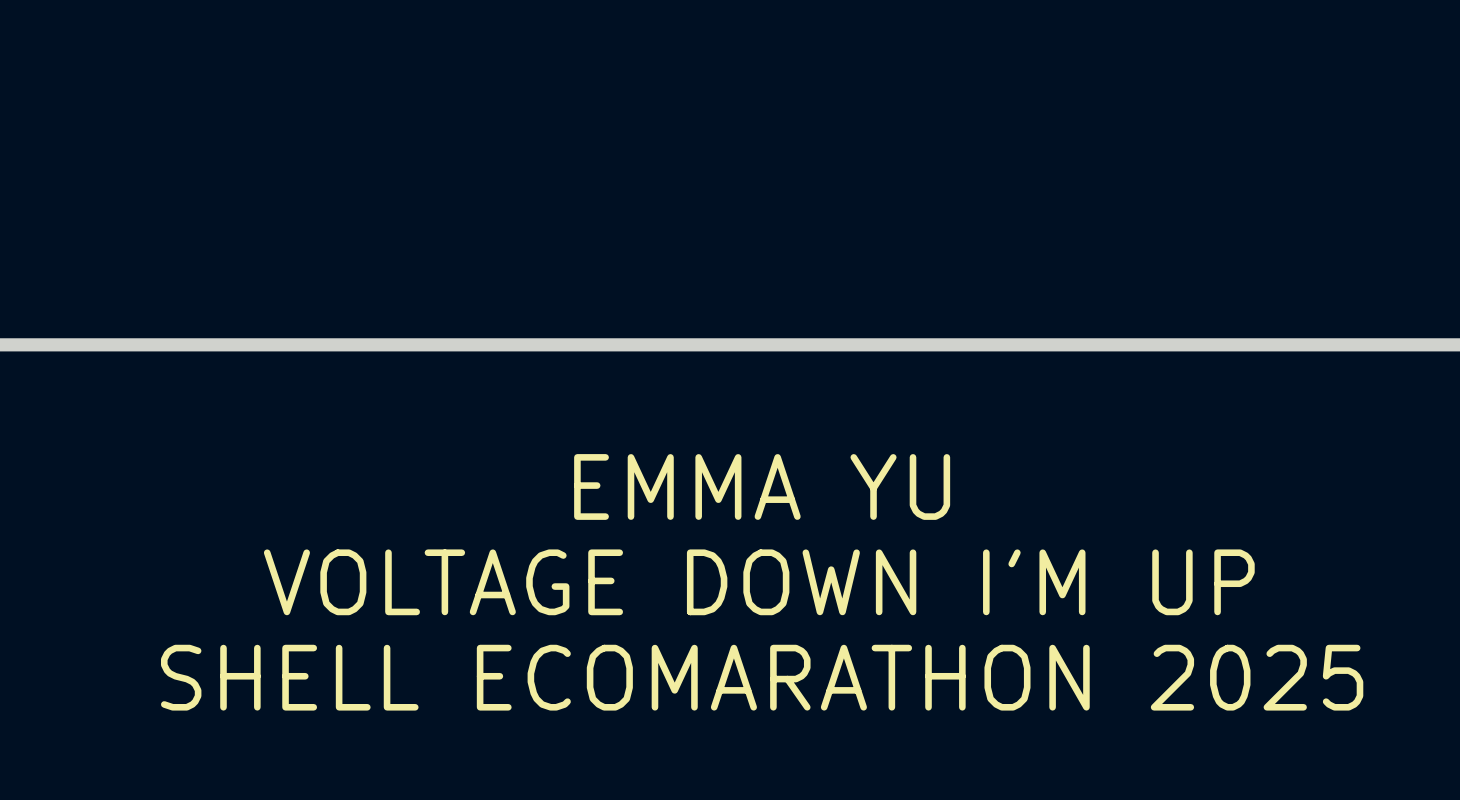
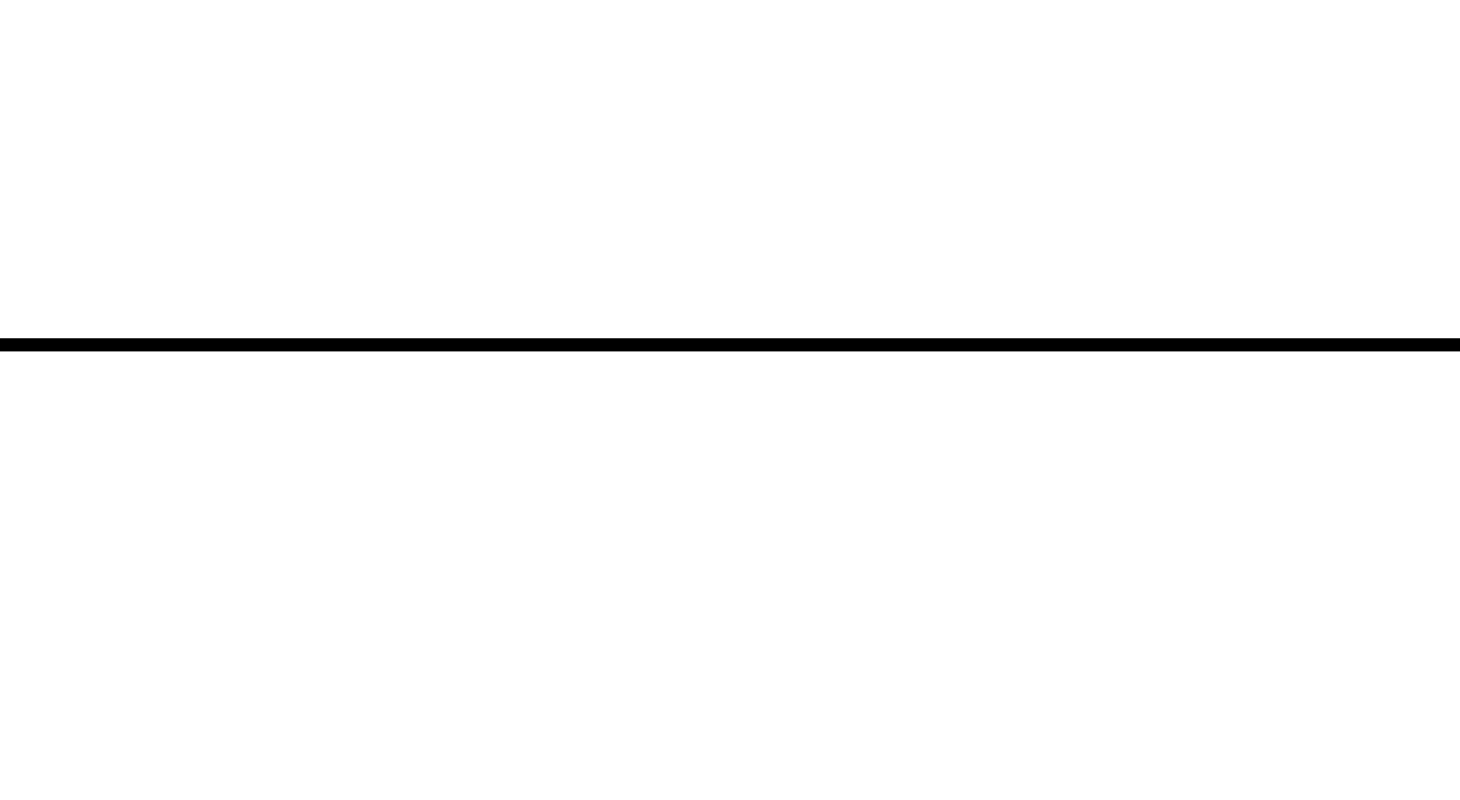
text: EMMA YU (762, 486) -> none
text: VOLTAGE DOWN I'M UP (759, 582) -> none
text: SHELL ECOMARATHON 2025 (762, 677) -> none

